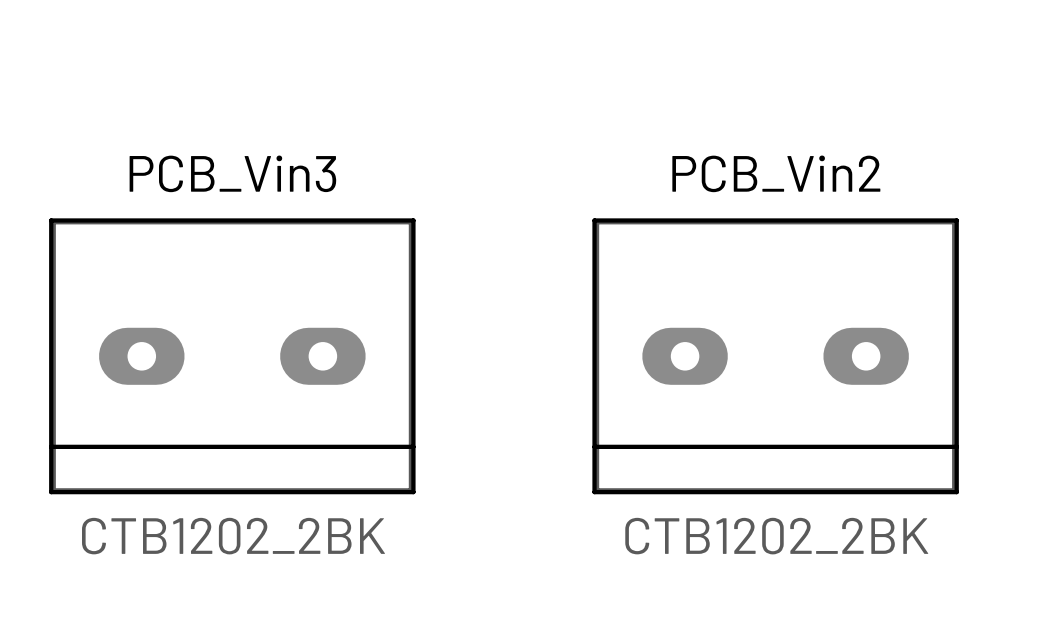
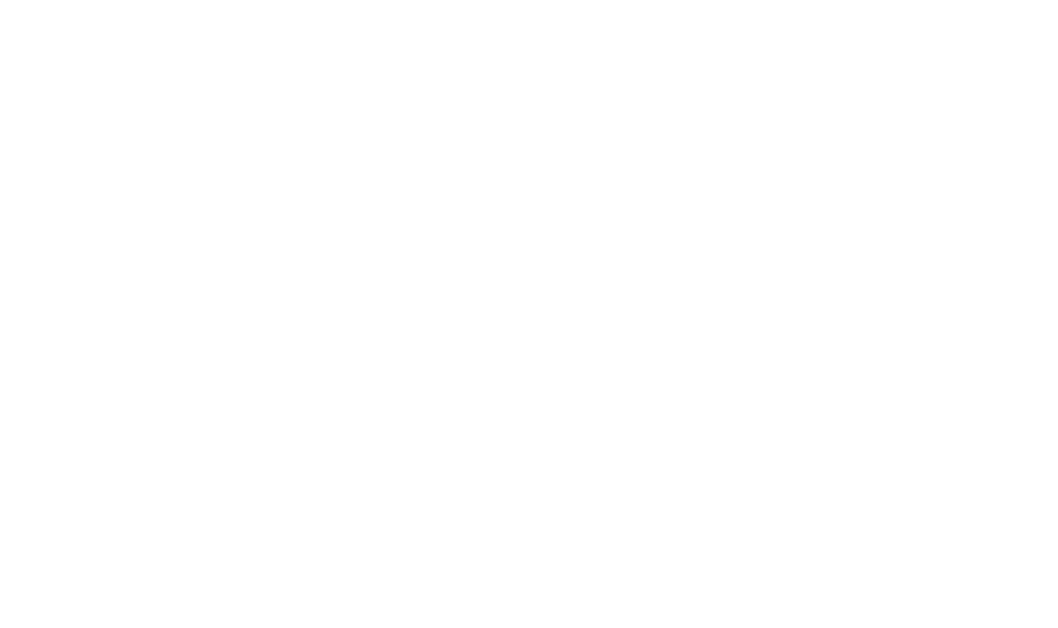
PCB_Vin3: CTB1202_2BK (232, 356) -> none
PCB_Vin2: CTB1202_2BK (775, 356) -> none

